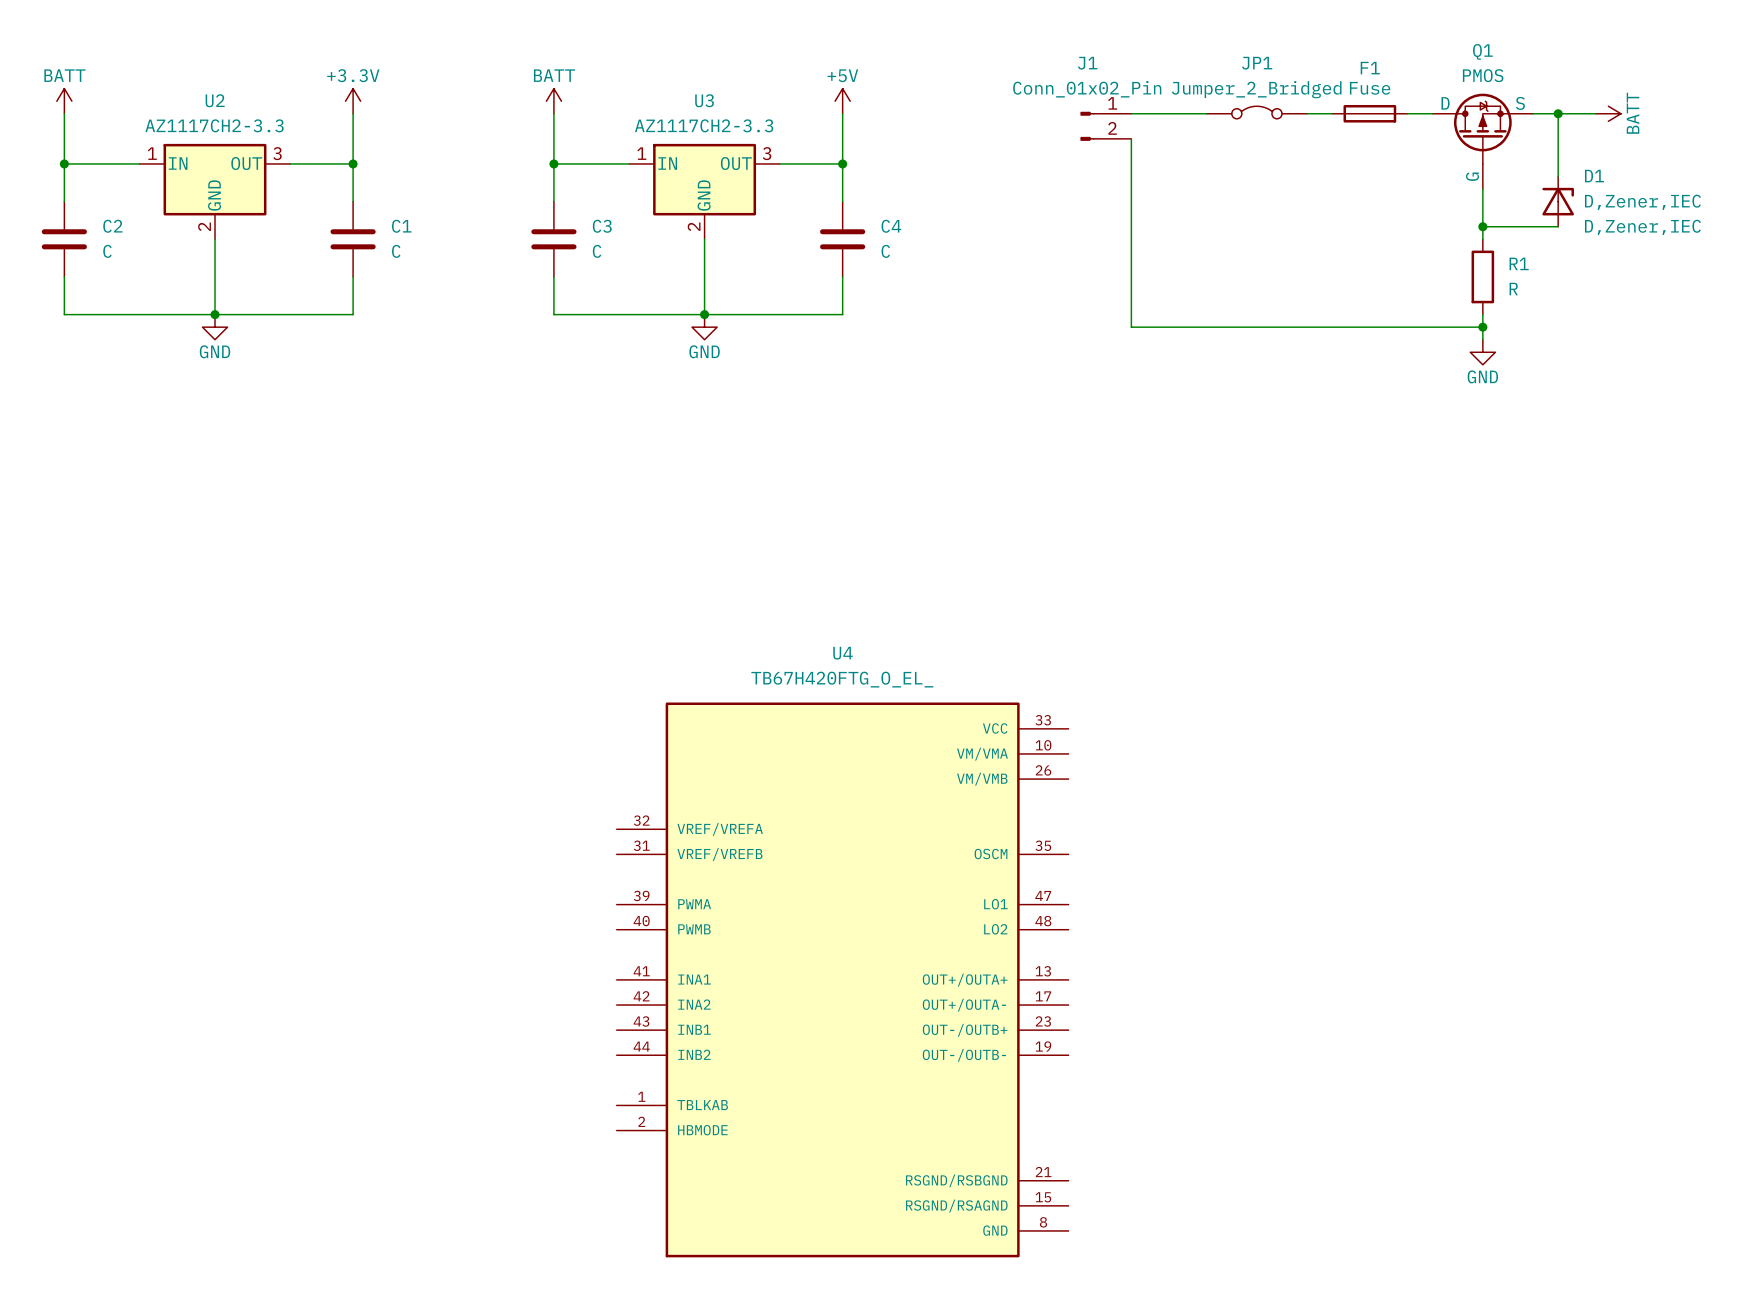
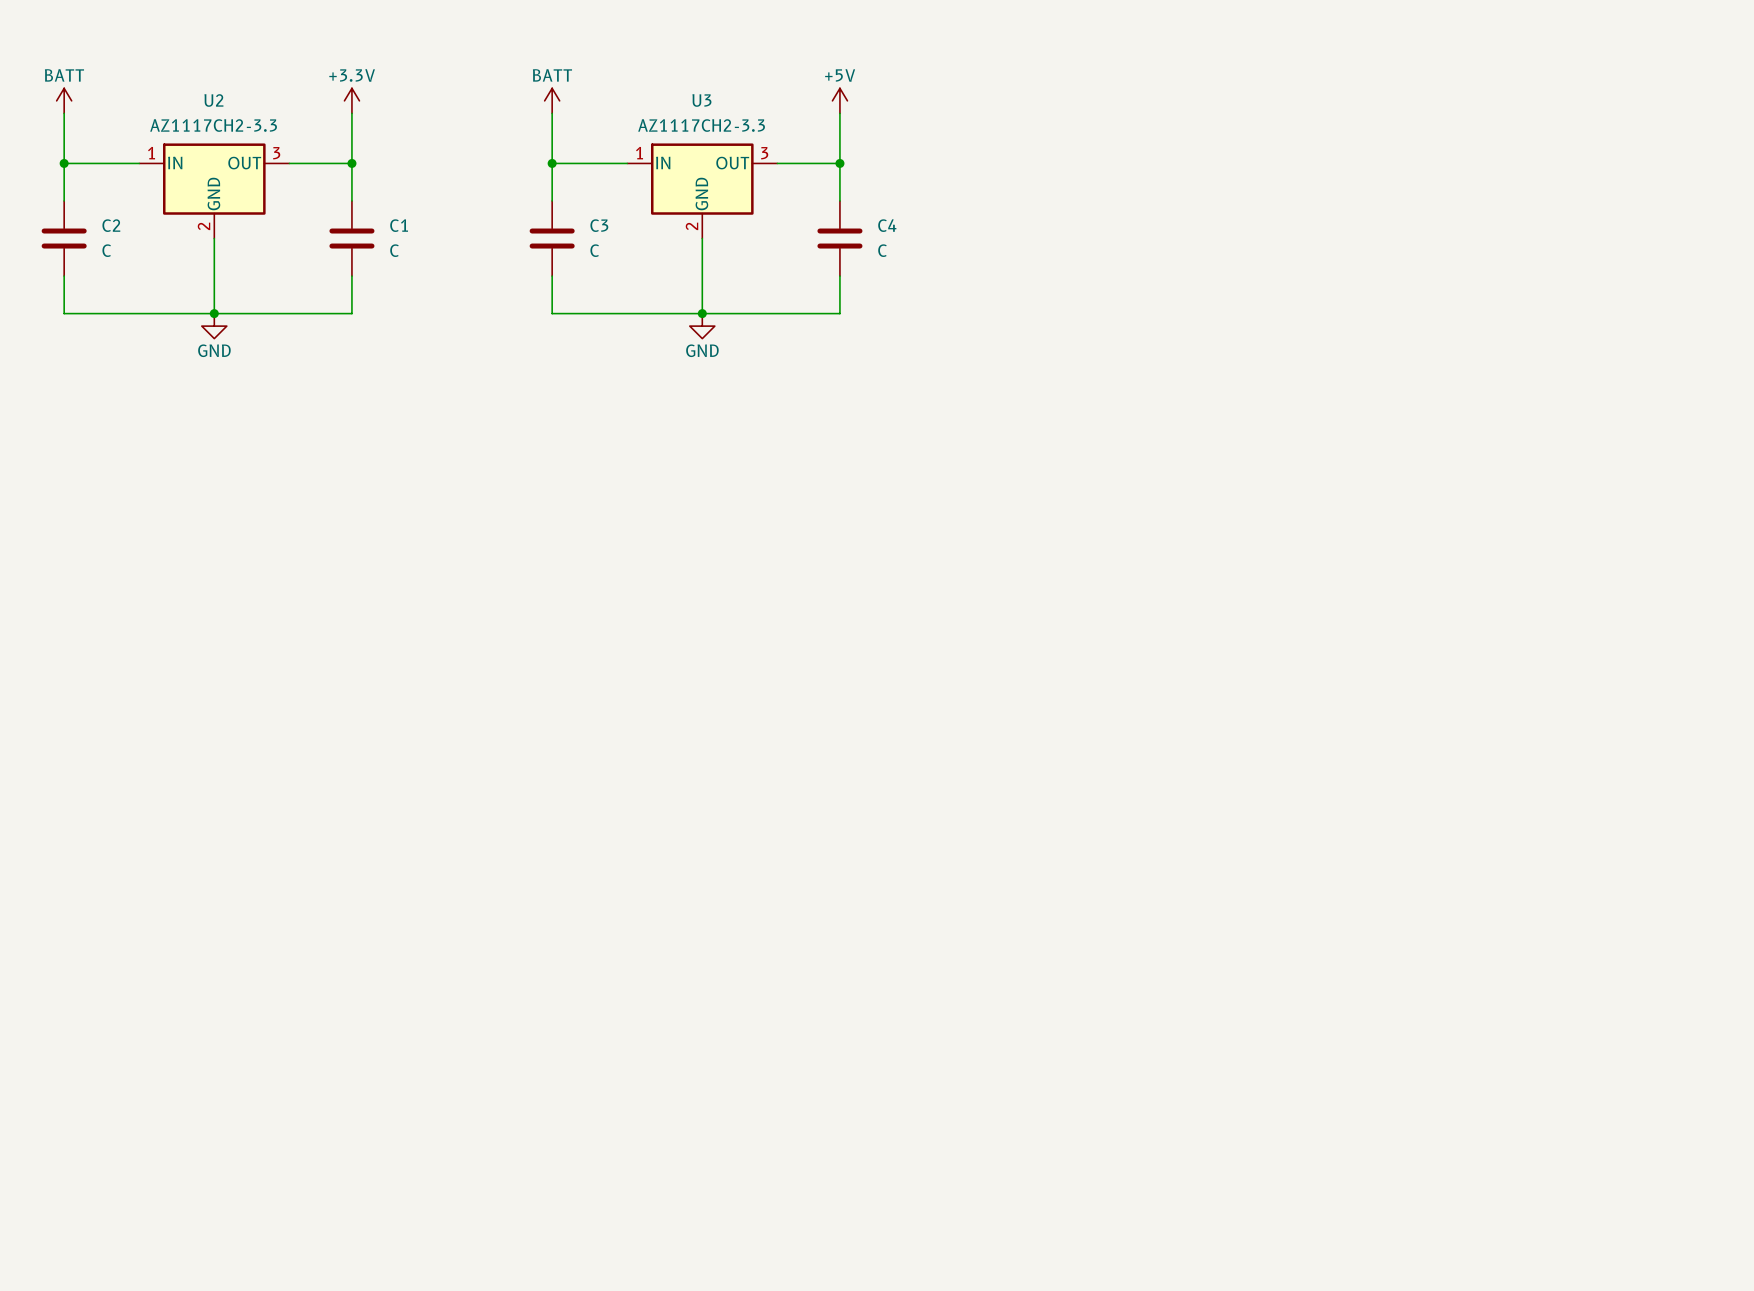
JP1: Jumper_2_Bridged (1256, 112) -> none
wire: (1131, 113) (1206, 113) -> none
wire: (1307, 113) (1332, 113) -> none
F1: Fuse (1369, 113) -> none
wire: (1407, 113) (1432, 113) -> none
wire: (1533, 113) (1595, 113) -> none
wire: (1558, 113) (1558, 176) -> none
junction: (1558, 113) -> none
power symbol: BATT (1608, 113) -> none
J1: Conn_01x02_Pin (1105, 126) -> none
wire: (1131, 138) (1131, 327) (1482, 327) -> none
Q1: PMOS (1482, 141) -> none
wire: (1482, 189) (1482, 239) -> none
D1: D,Zener,IEC (1558, 201) -> none
wire: (1482, 226) (1558, 226) -> none
junction: (1482, 226) -> none
R1: R (1482, 276) -> none
wire: (1482, 314) (1482, 339) -> none
junction: (1482, 327) -> none
power symbol: GND (1482, 352) -> none
U4: TB67H420FTG_O_EL_ (842, 979) -> none

